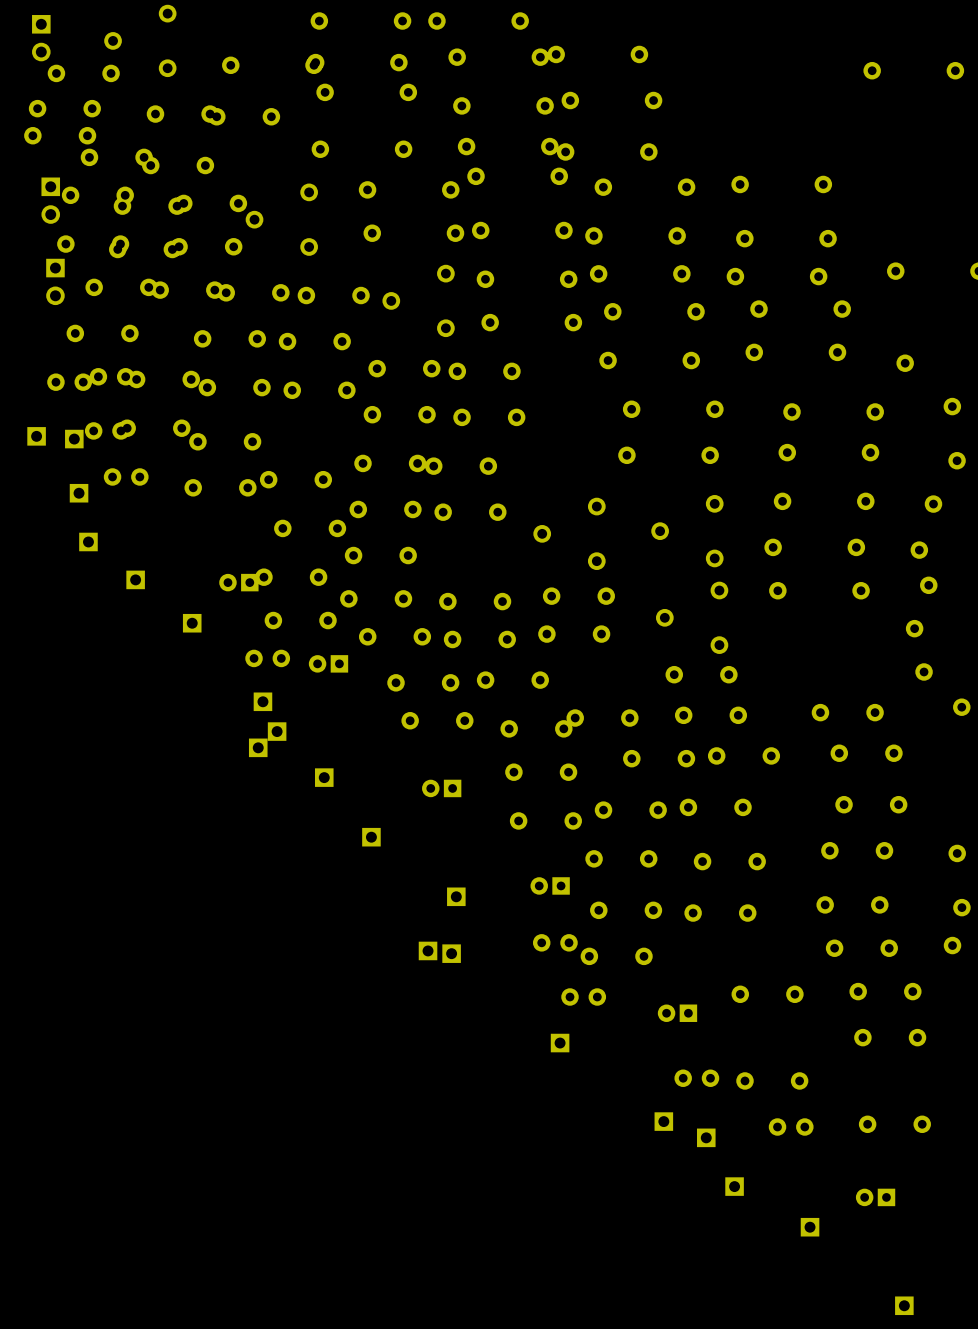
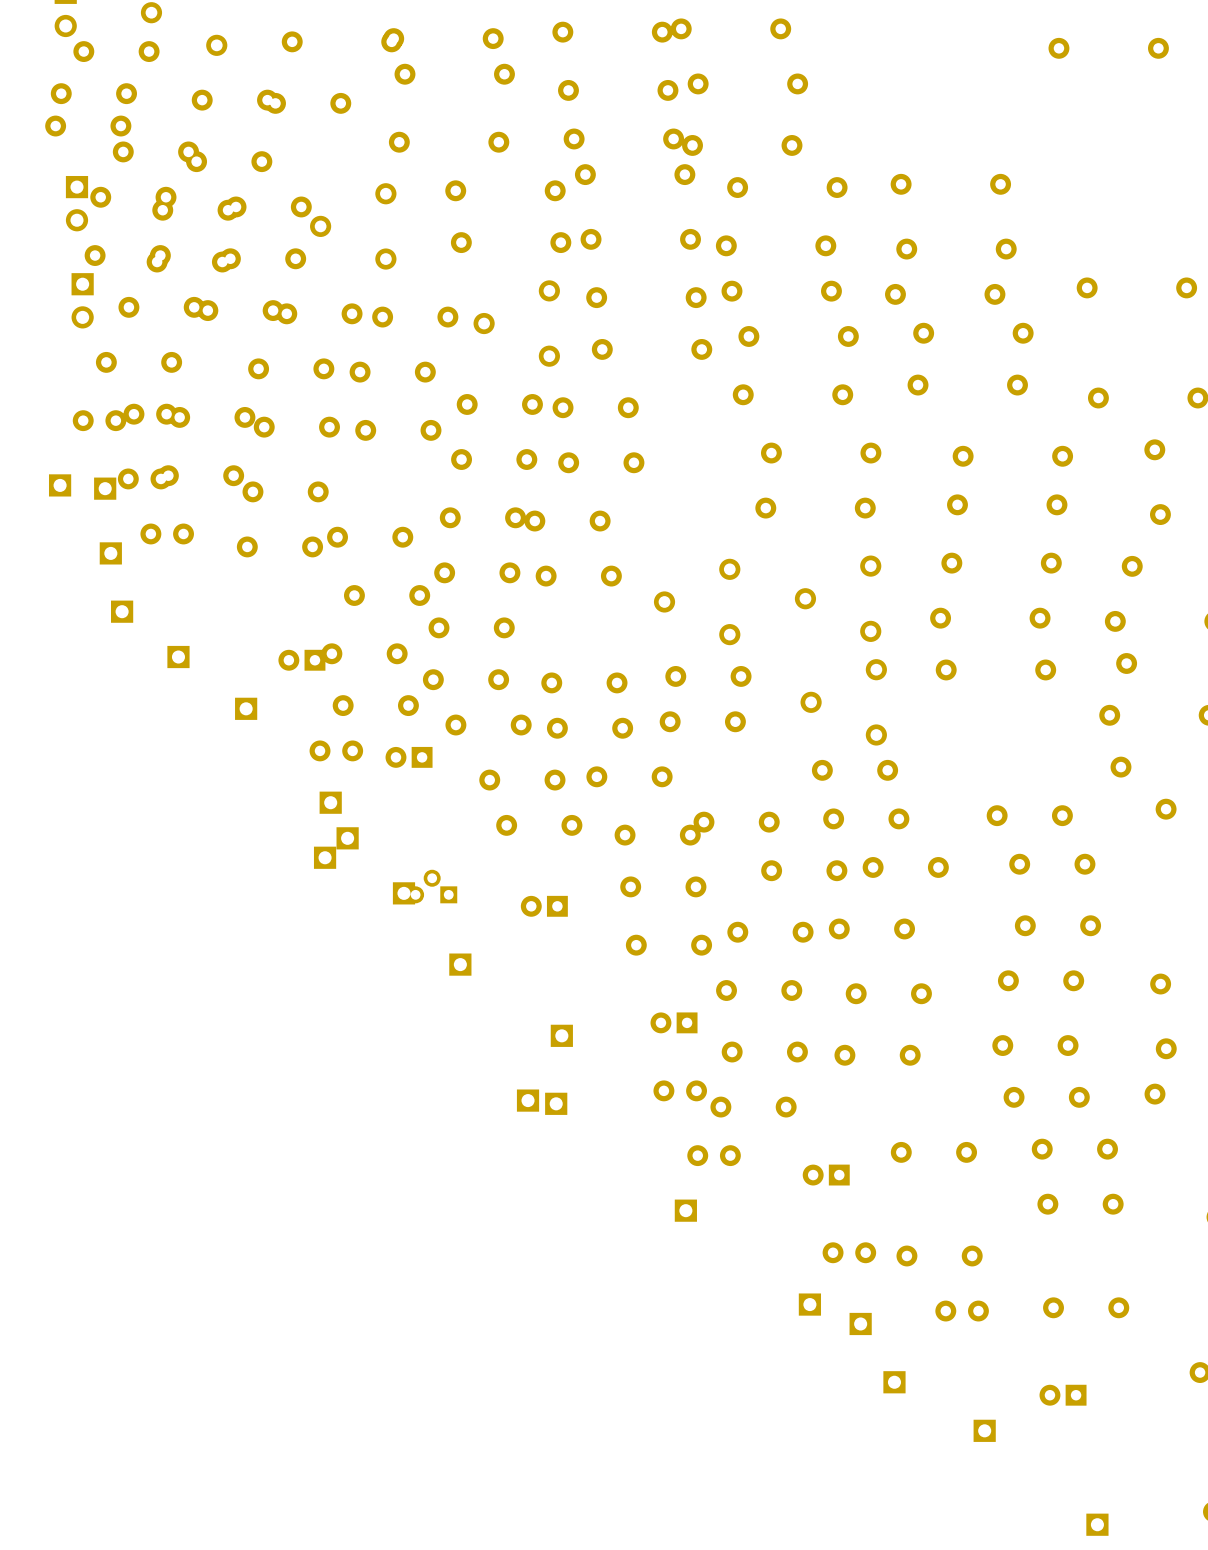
part: none -> (432, 886)

